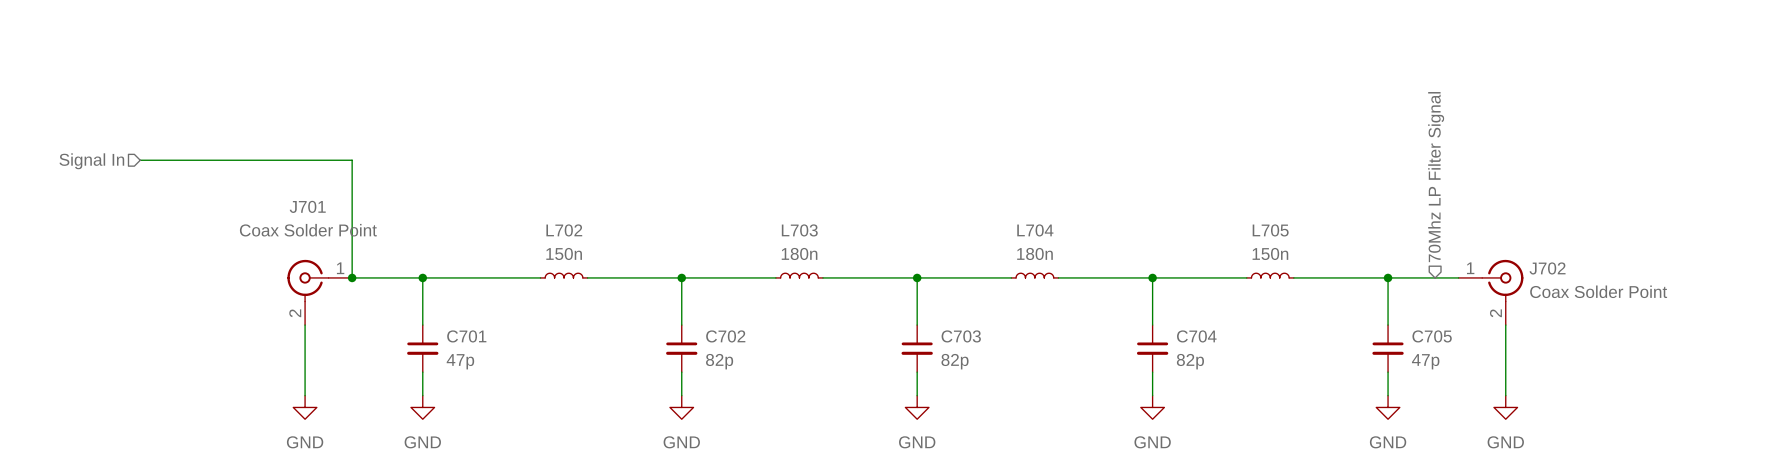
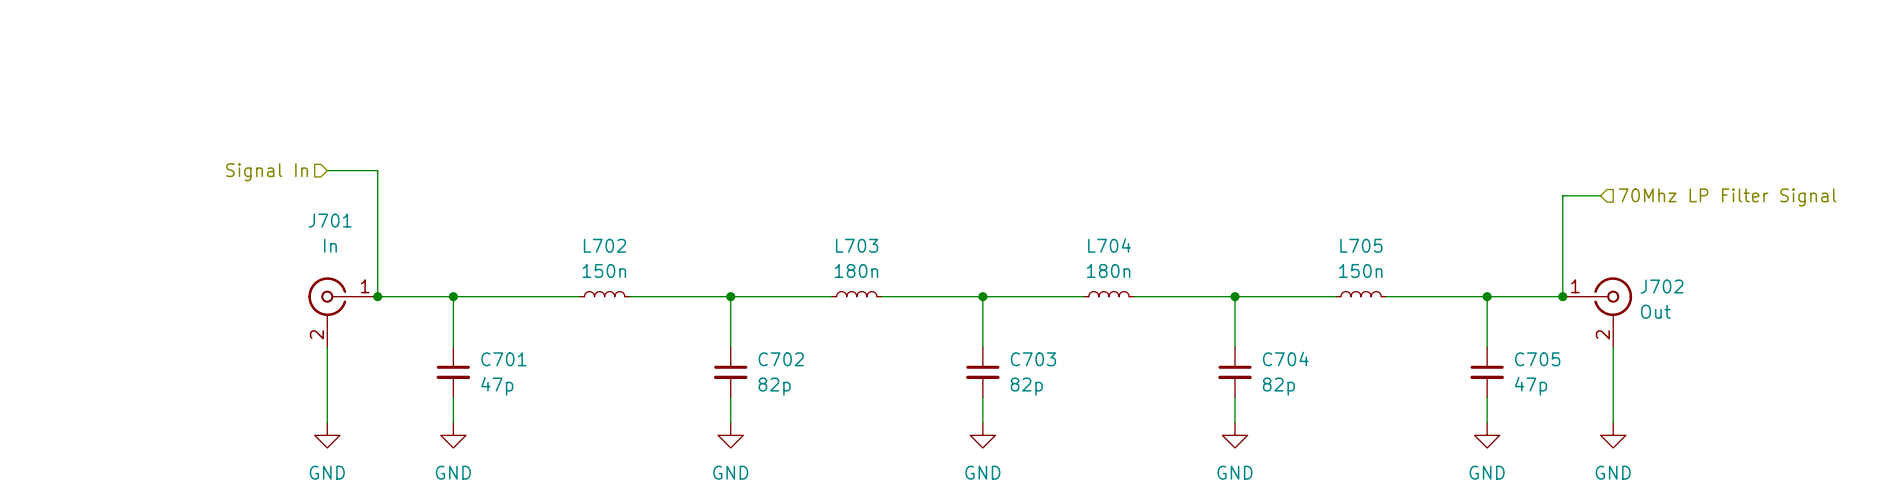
wire: (140, 160) (305, 160) -> none
hierarchical label position: Signal In (91, 161) -> Signal In (267, 172)
hierarchical label rotation: 0° (1436, 177) -> 90° clockwise (1727, 197)
wire: none -> (1600, 195) (1562, 195) (1562, 296)
J701 value: Coax Solder Point (308, 230) -> In (330, 245)
junction: none -> (1562, 296)
J702 value: Coax Solder Point (1598, 291) -> Out (1655, 311)

